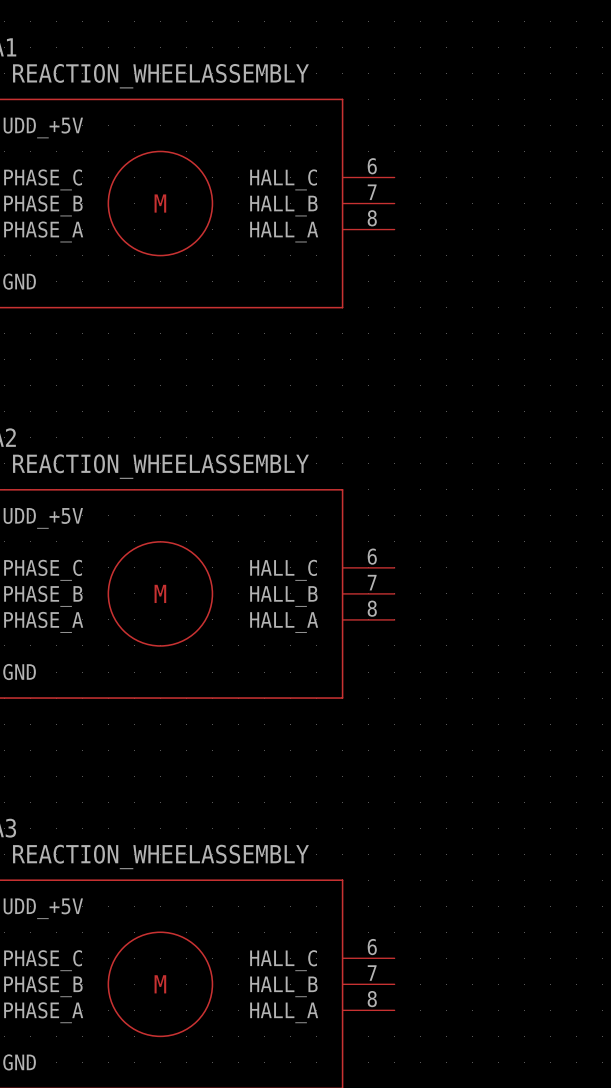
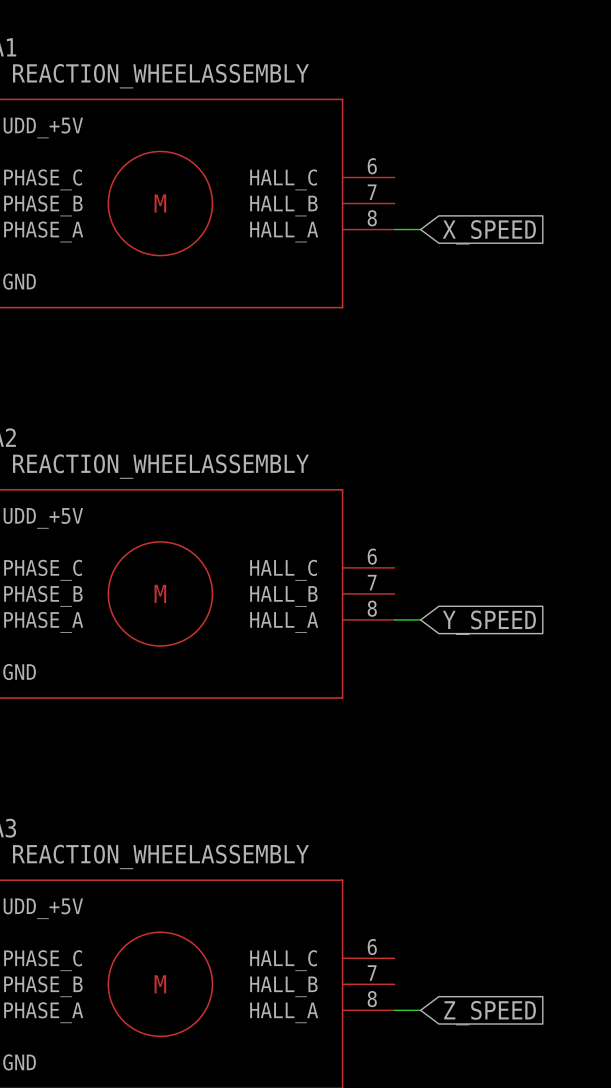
wire: none -> (394, 229) (420, 229)
global label: none -> X_SPEED (489, 232)
wire: none -> (394, 619) (420, 619)
global label: none -> Y_SPEED (489, 622)
wire: none -> (394, 1010) (420, 1010)
global label: none -> Z_SPEED (490, 1013)

